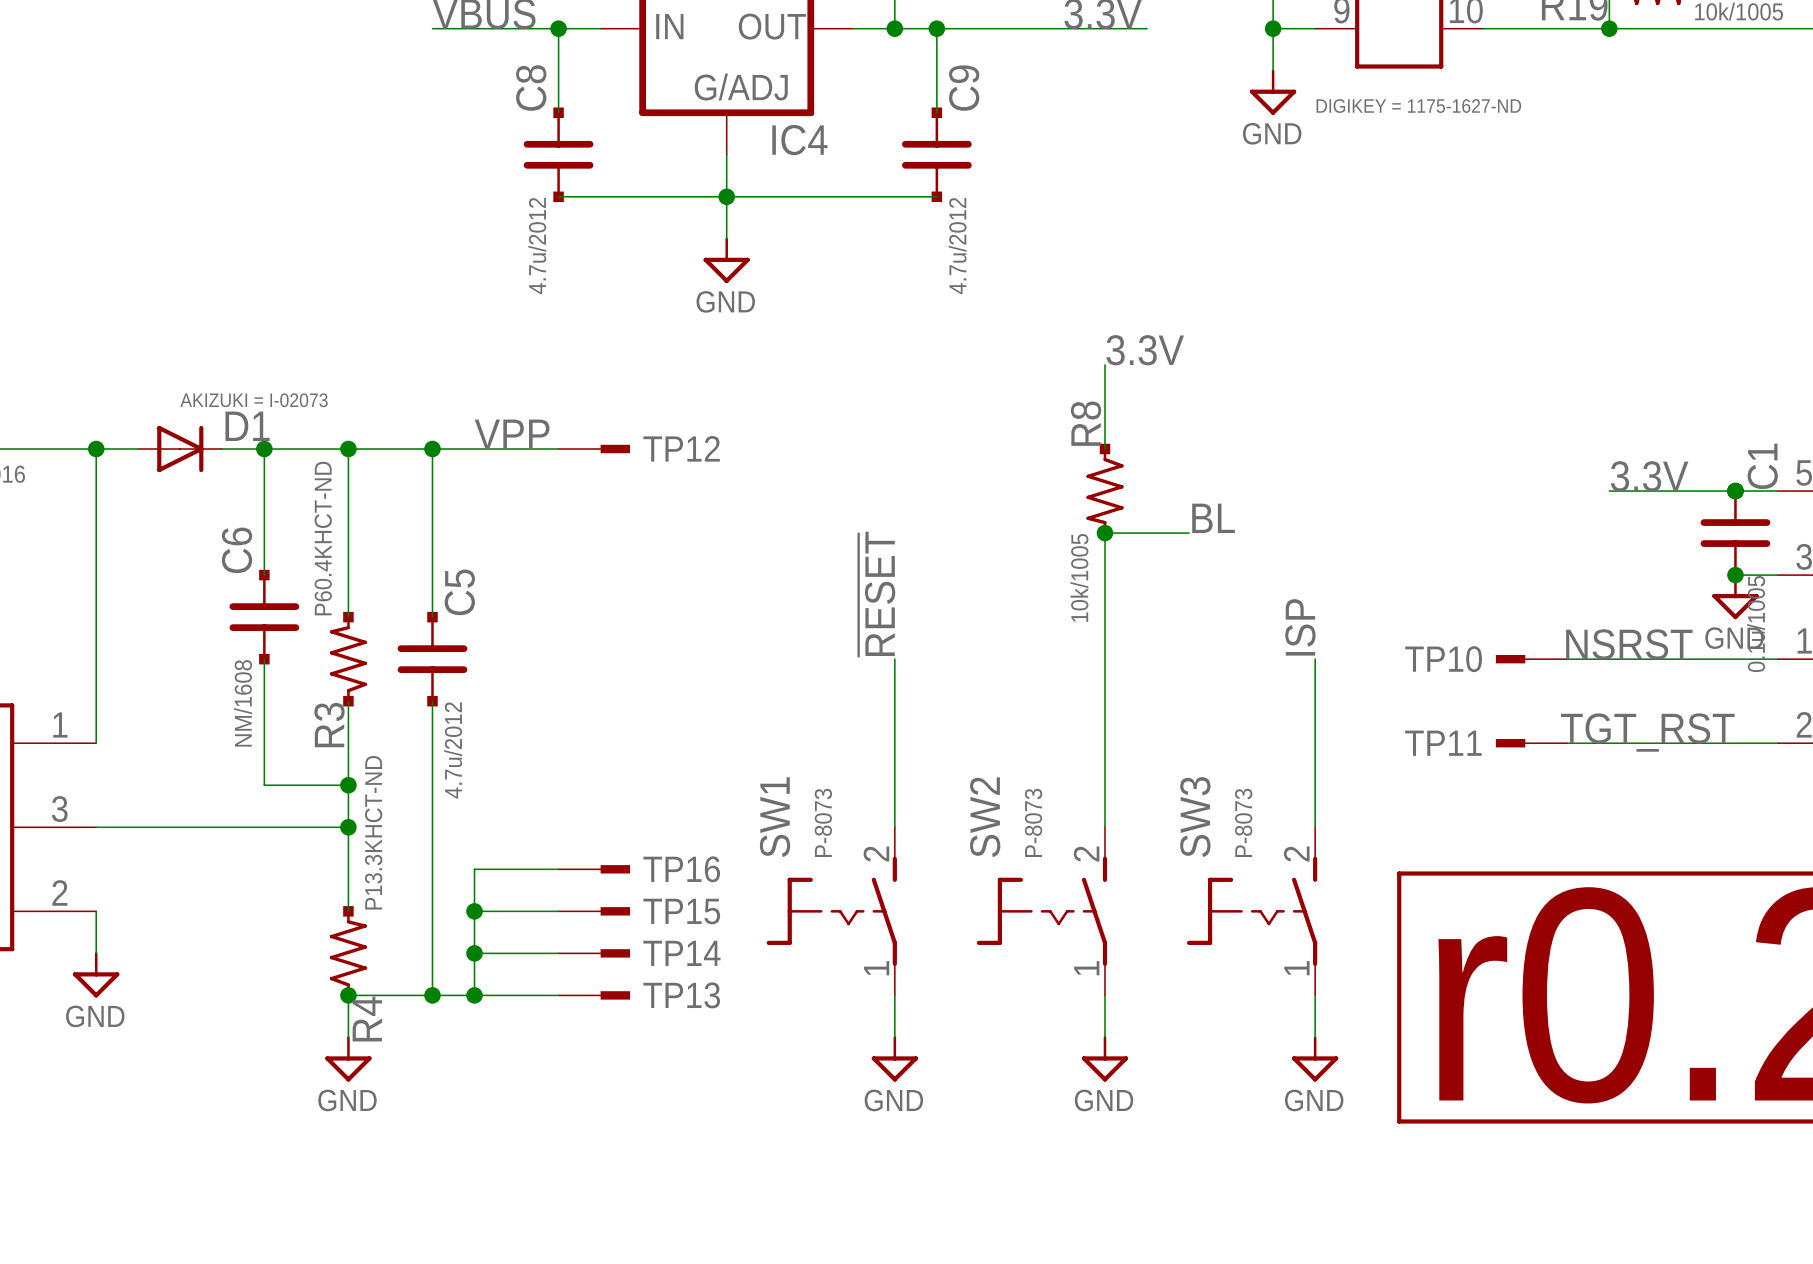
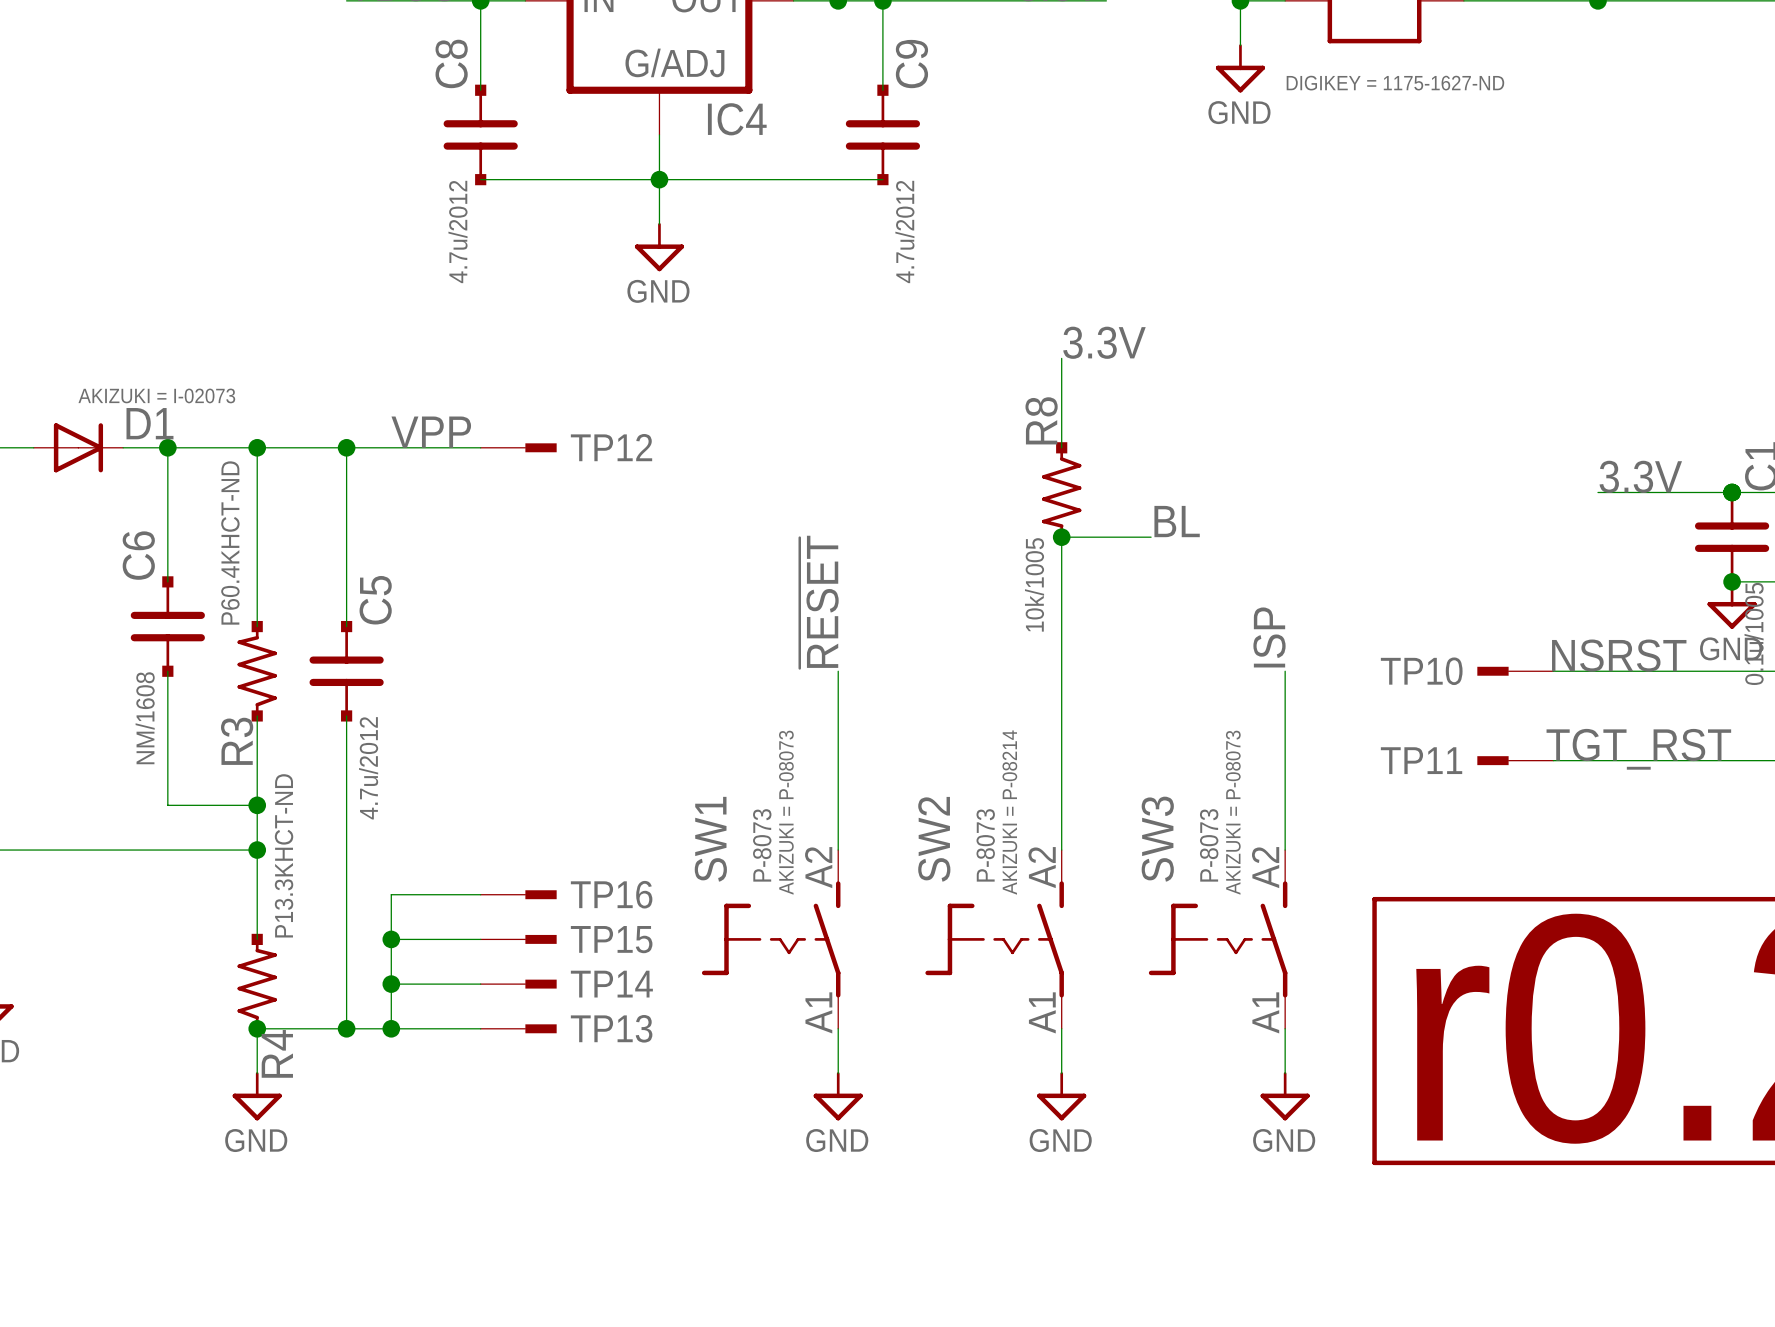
SW1 text: none -> AKIZUKI = P-08073 (786, 812)
SW2 text: none -> AKIZUKI = P-08214 (1009, 812)
SW3 text: none -> AKIZUKI = P-08073 (1233, 812)
SW1 pin number: 2 (876, 854) -> A2 (818, 867)
SW2 pin number: 2 (1086, 854) -> A2 (1042, 867)
SW3 pin number: 2 (1296, 854) -> A2 (1265, 867)
SW1 pin number: 1 (876, 968) -> A1 (818, 1012)
SW2 pin number: 1 (1086, 968) -> A1 (1042, 1012)
SW3 pin number: 1 (1296, 968) -> A1 (1265, 1012)

